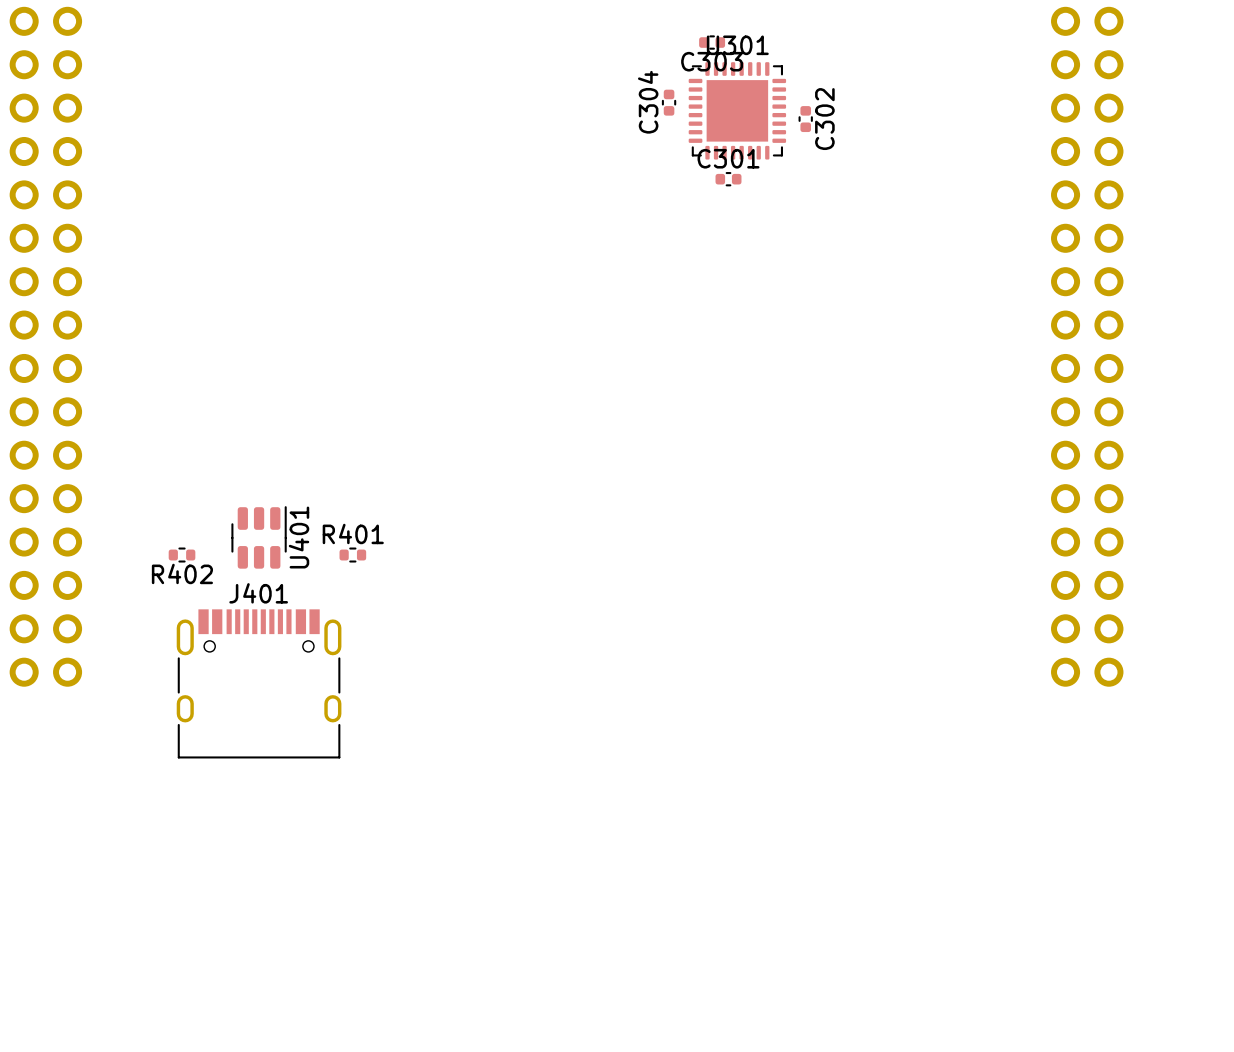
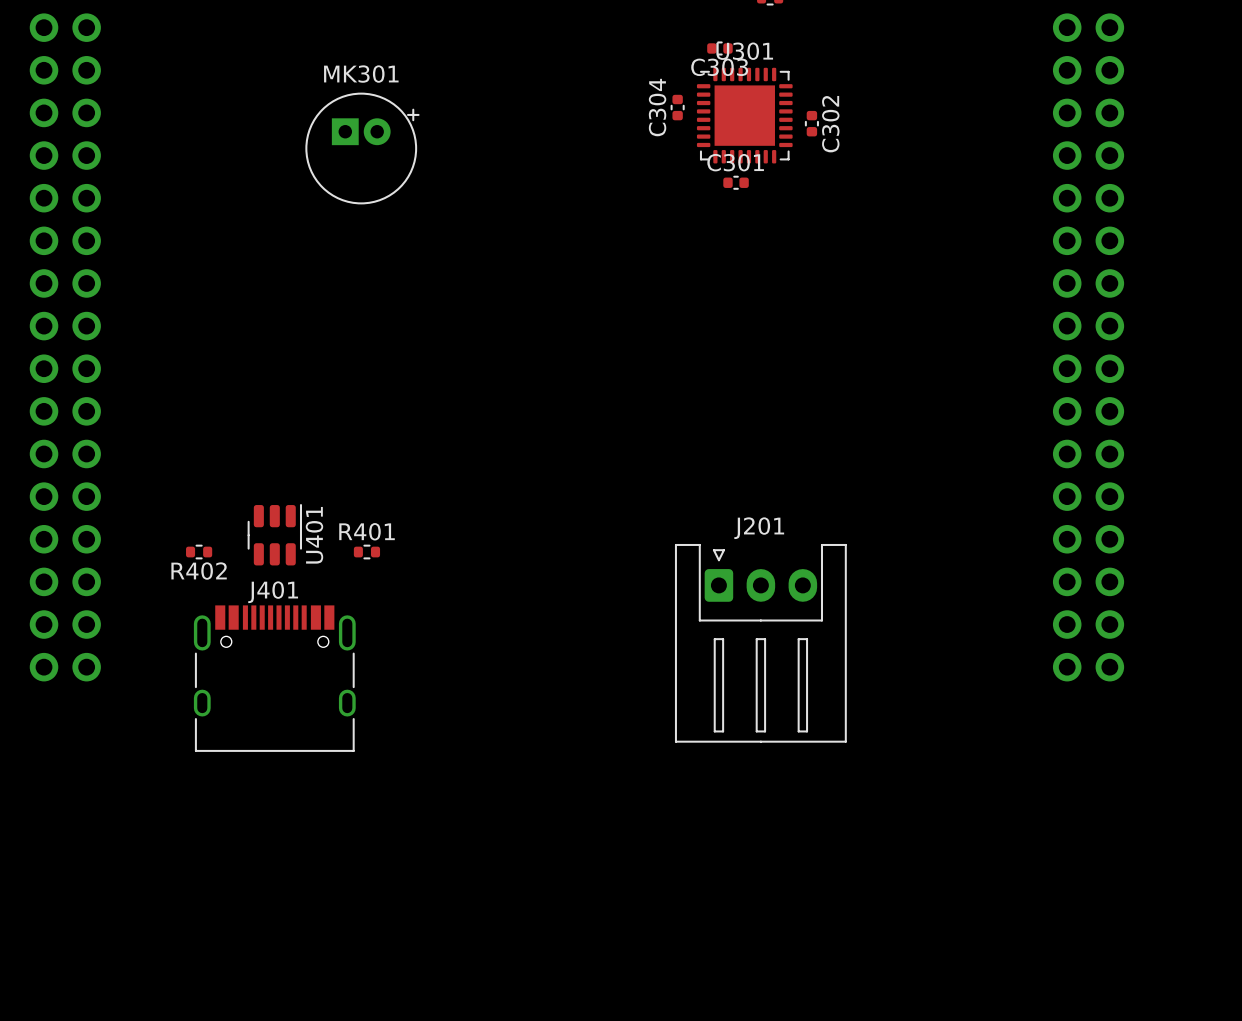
MK301: none -> (362, 148)
J201: none -> (760, 643)

